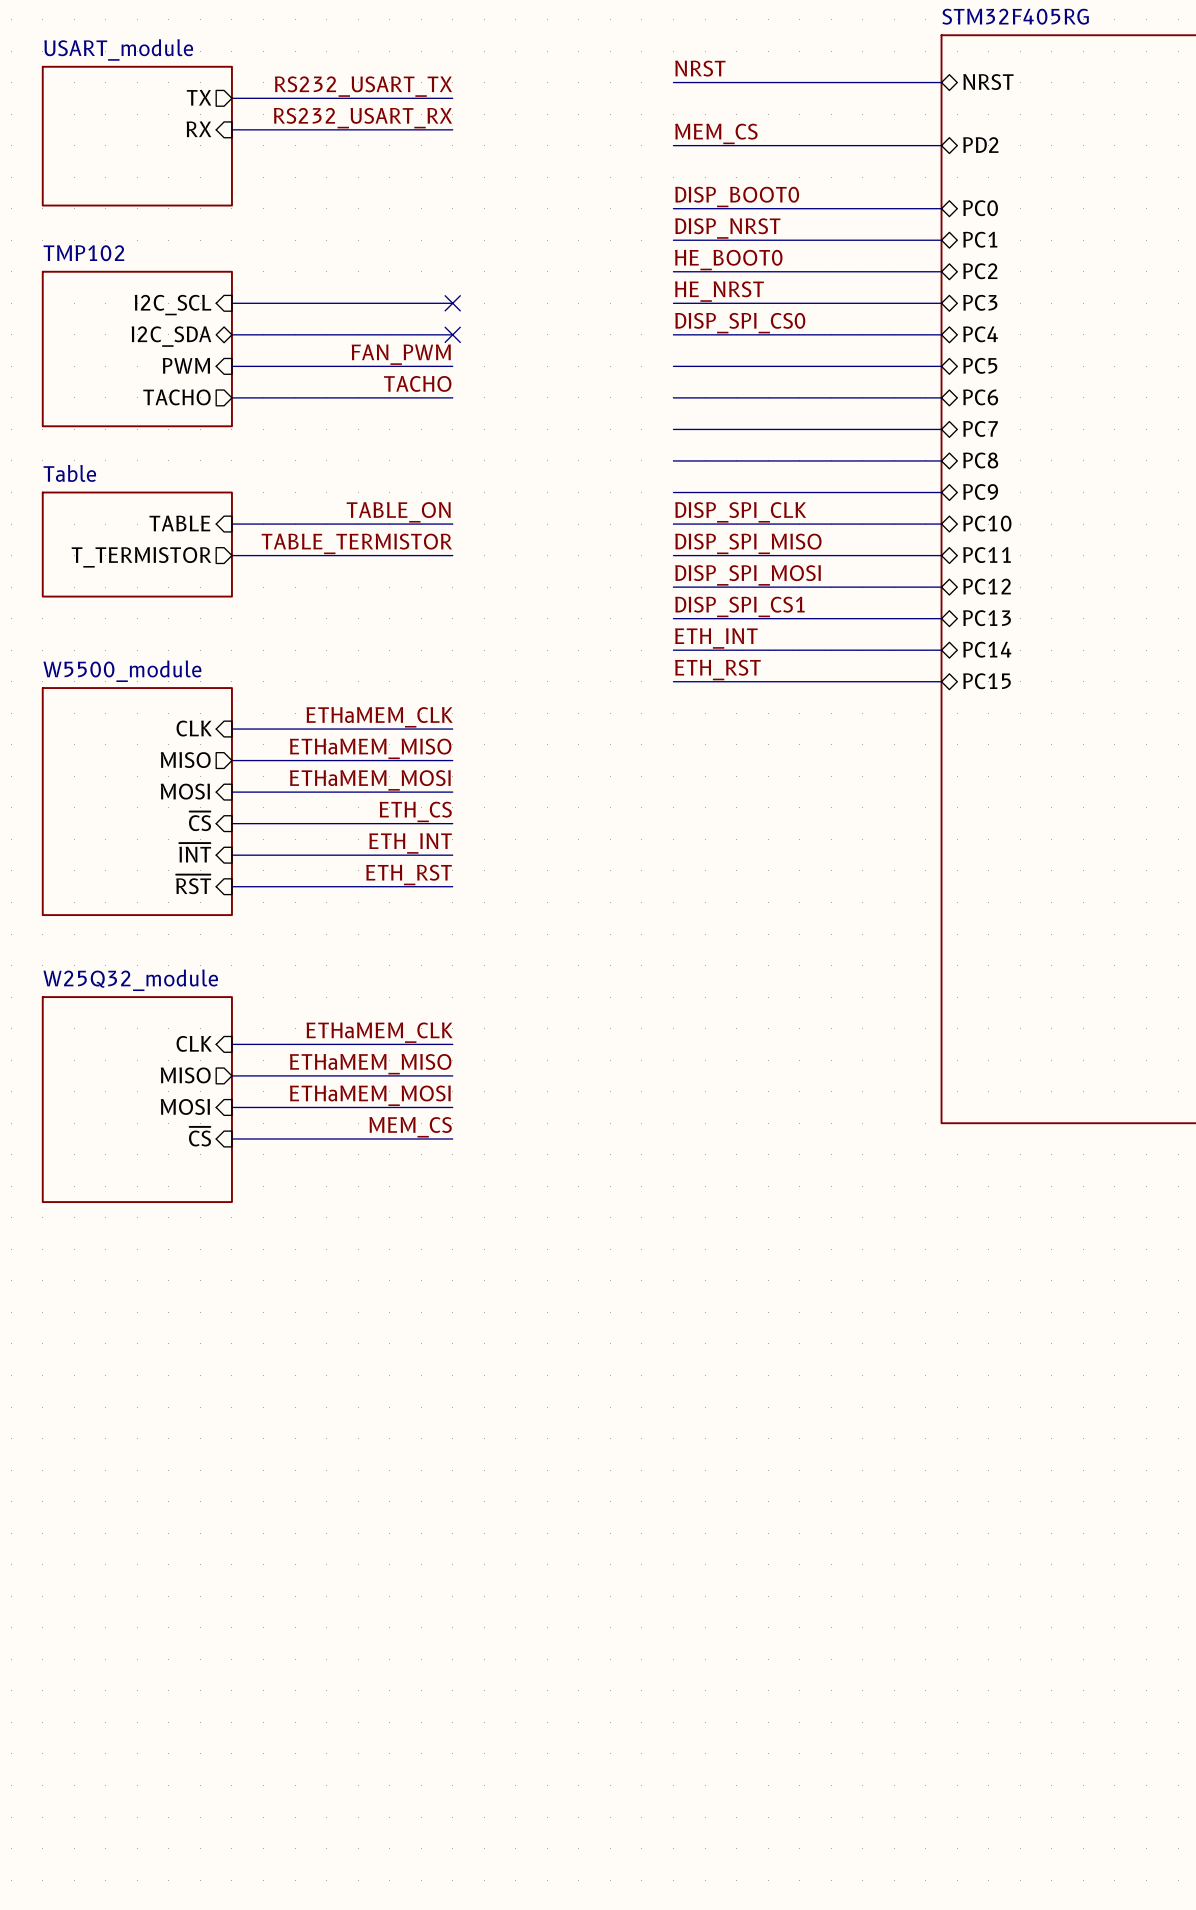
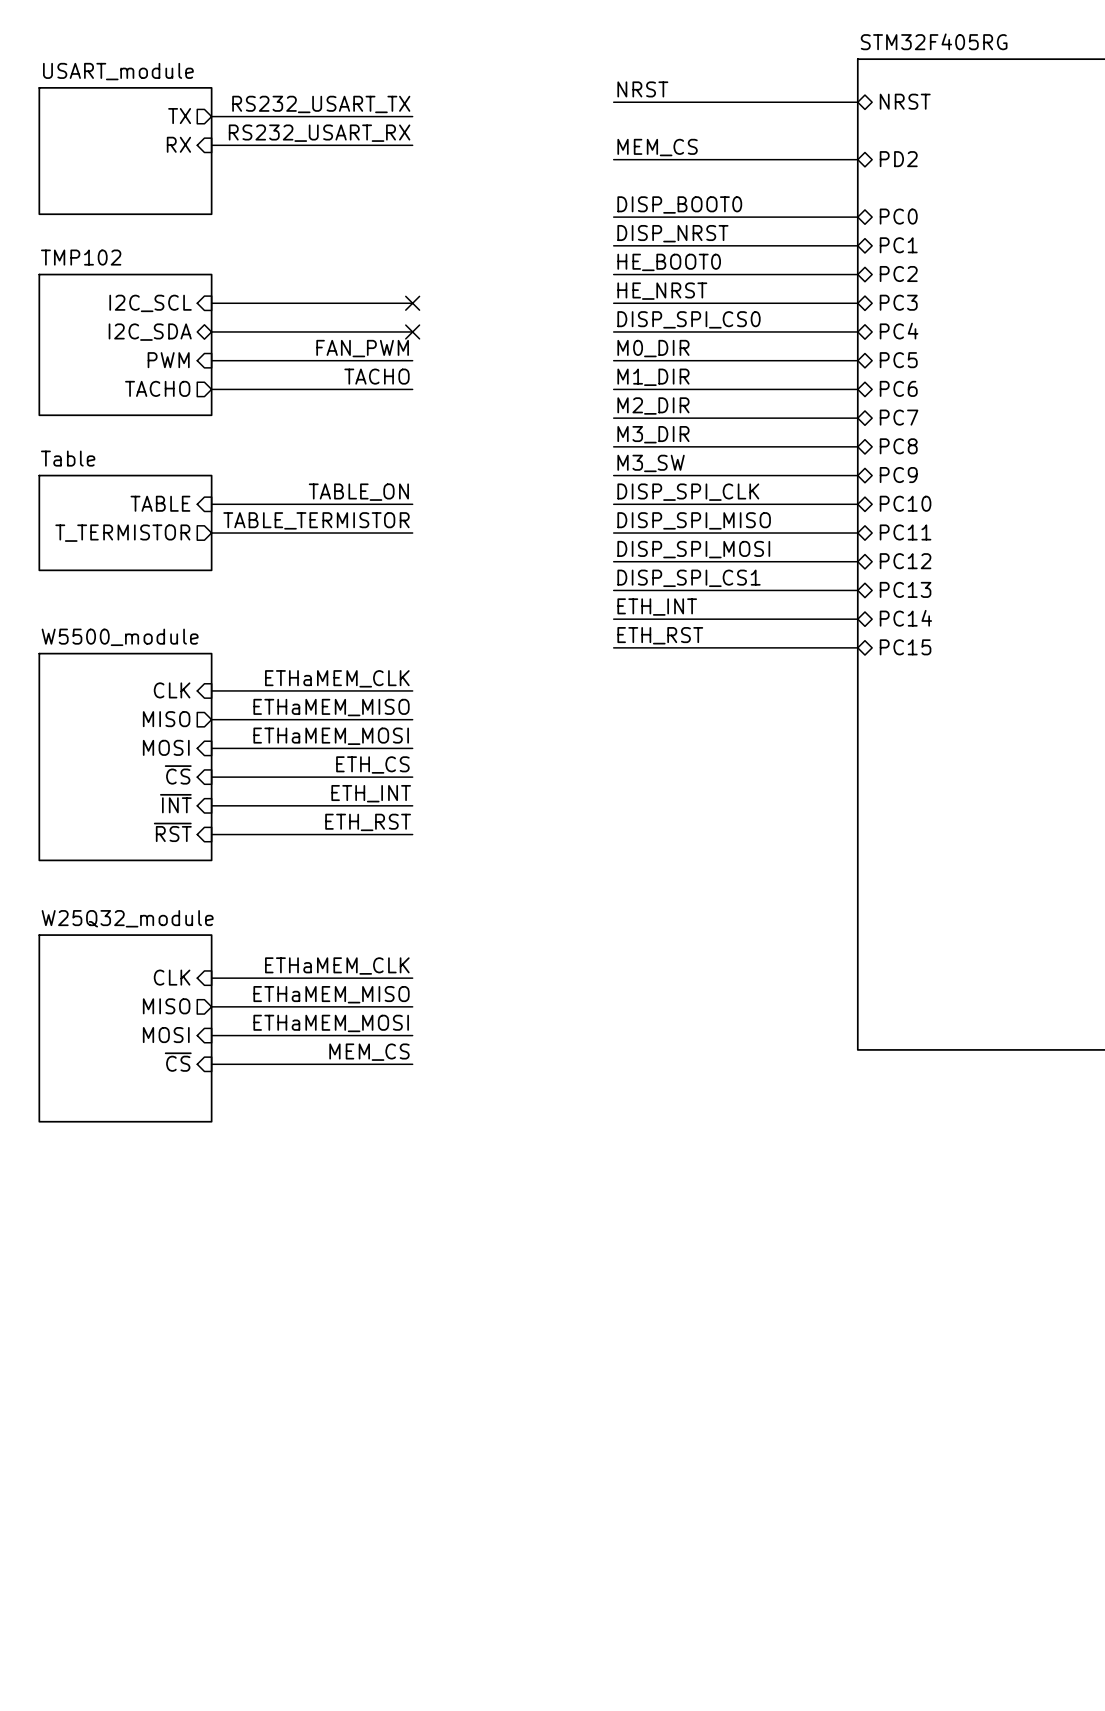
label: none -> M0_DIR (653, 348)
label: none -> M1_DIR (653, 377)
label: none -> M2_DIR (653, 406)
label: none -> M3_DIR (653, 434)
label: none -> M3_SW (651, 463)

